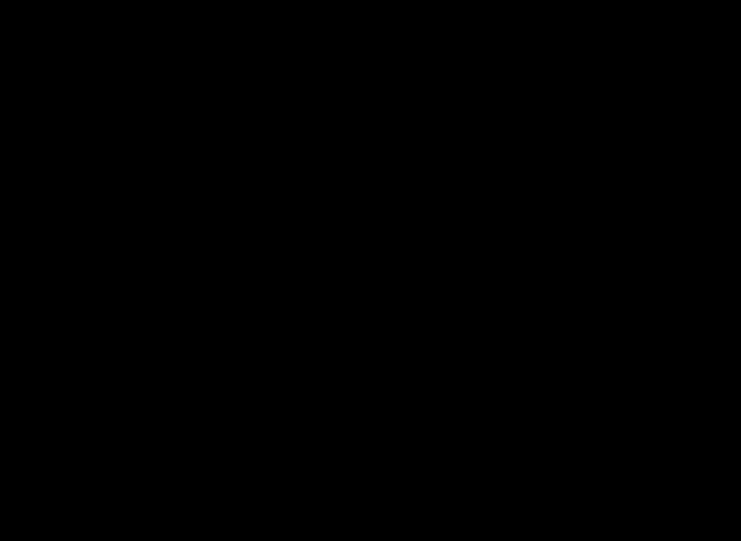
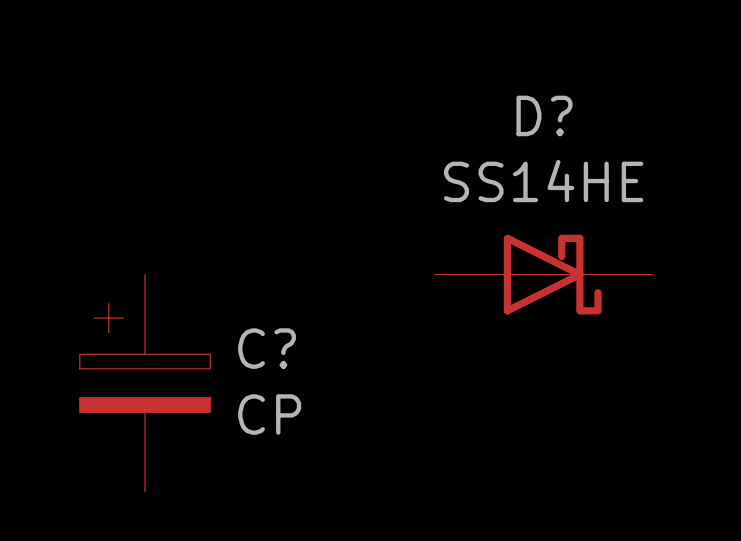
D?: none -> SS14HE (543, 274)
C?: none -> CP (145, 383)

